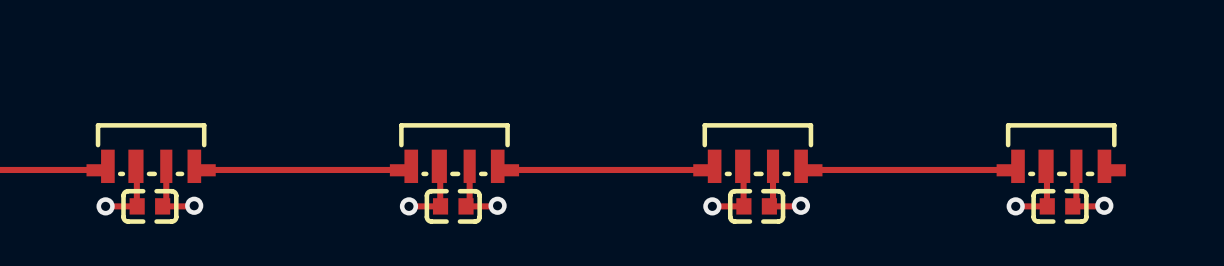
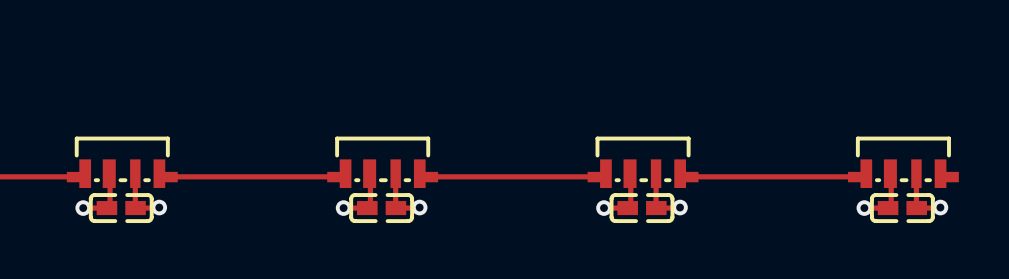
part footprint: [121, 188, 179, 224] -> [88, 193, 154, 224]
part footprint: [424, 188, 482, 224] -> [349, 193, 415, 224]
part footprint: [727, 188, 786, 224] -> [609, 193, 675, 224]
part footprint: [1031, 188, 1089, 224] -> [869, 193, 935, 224]

